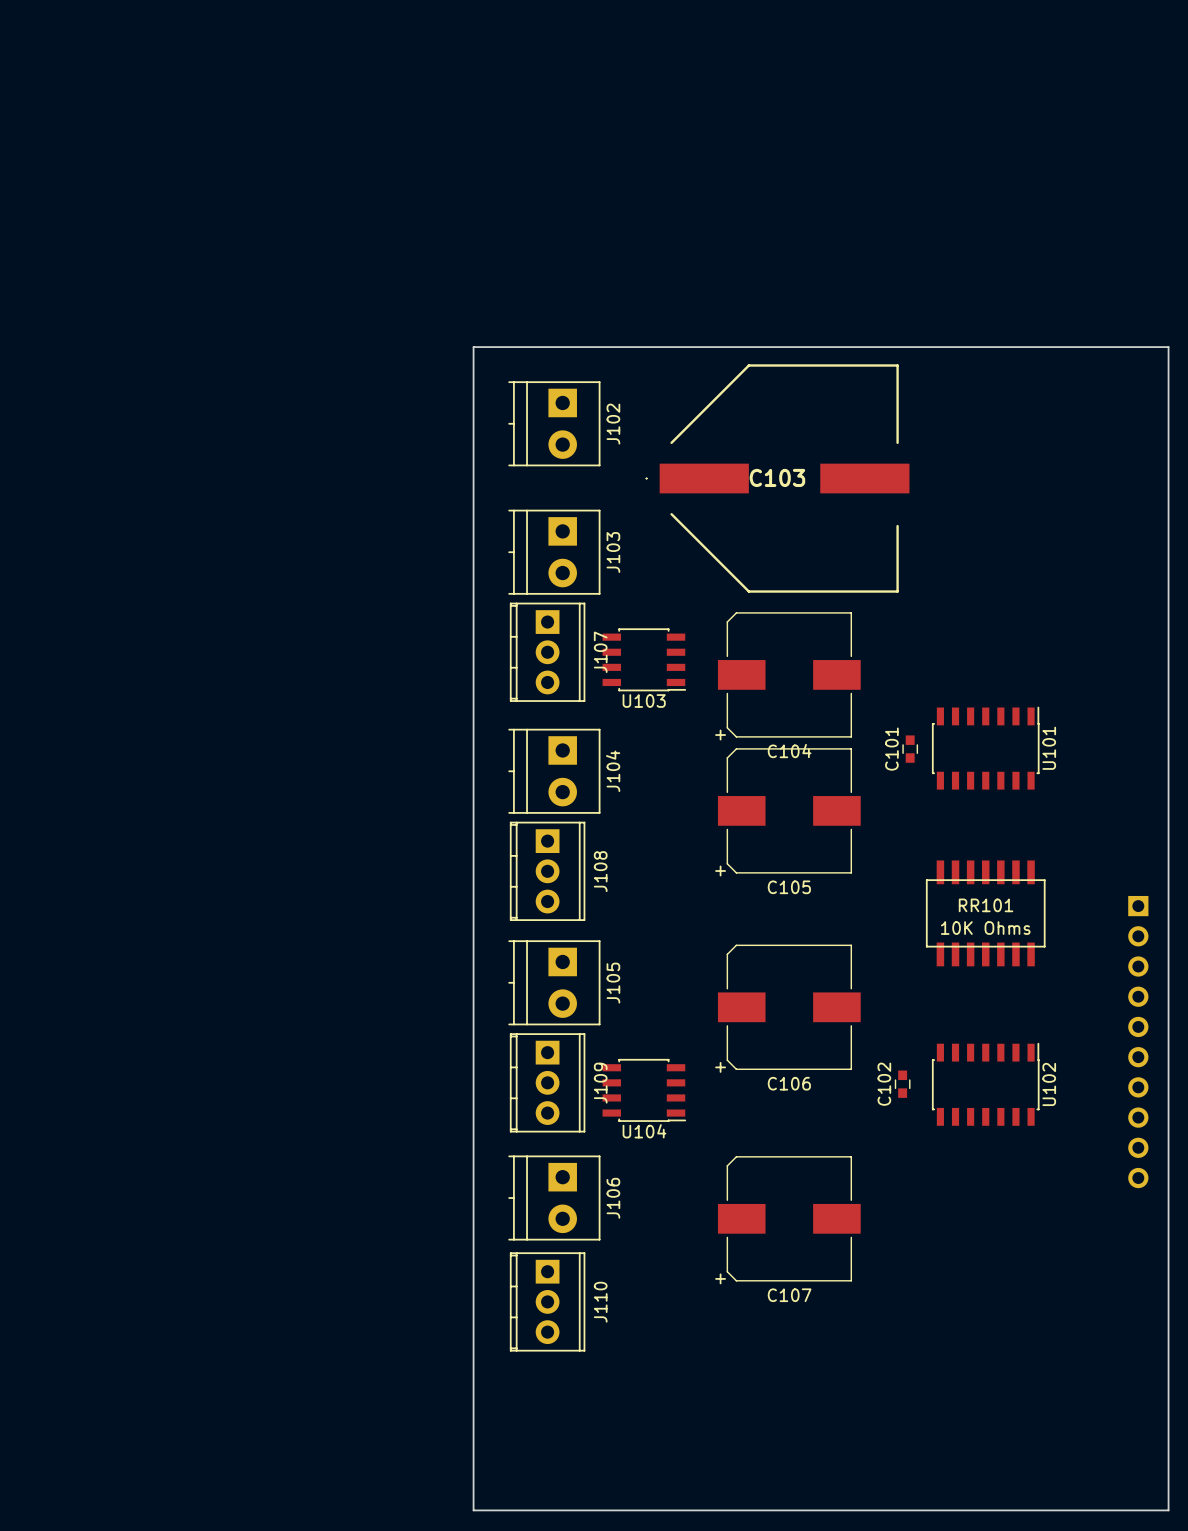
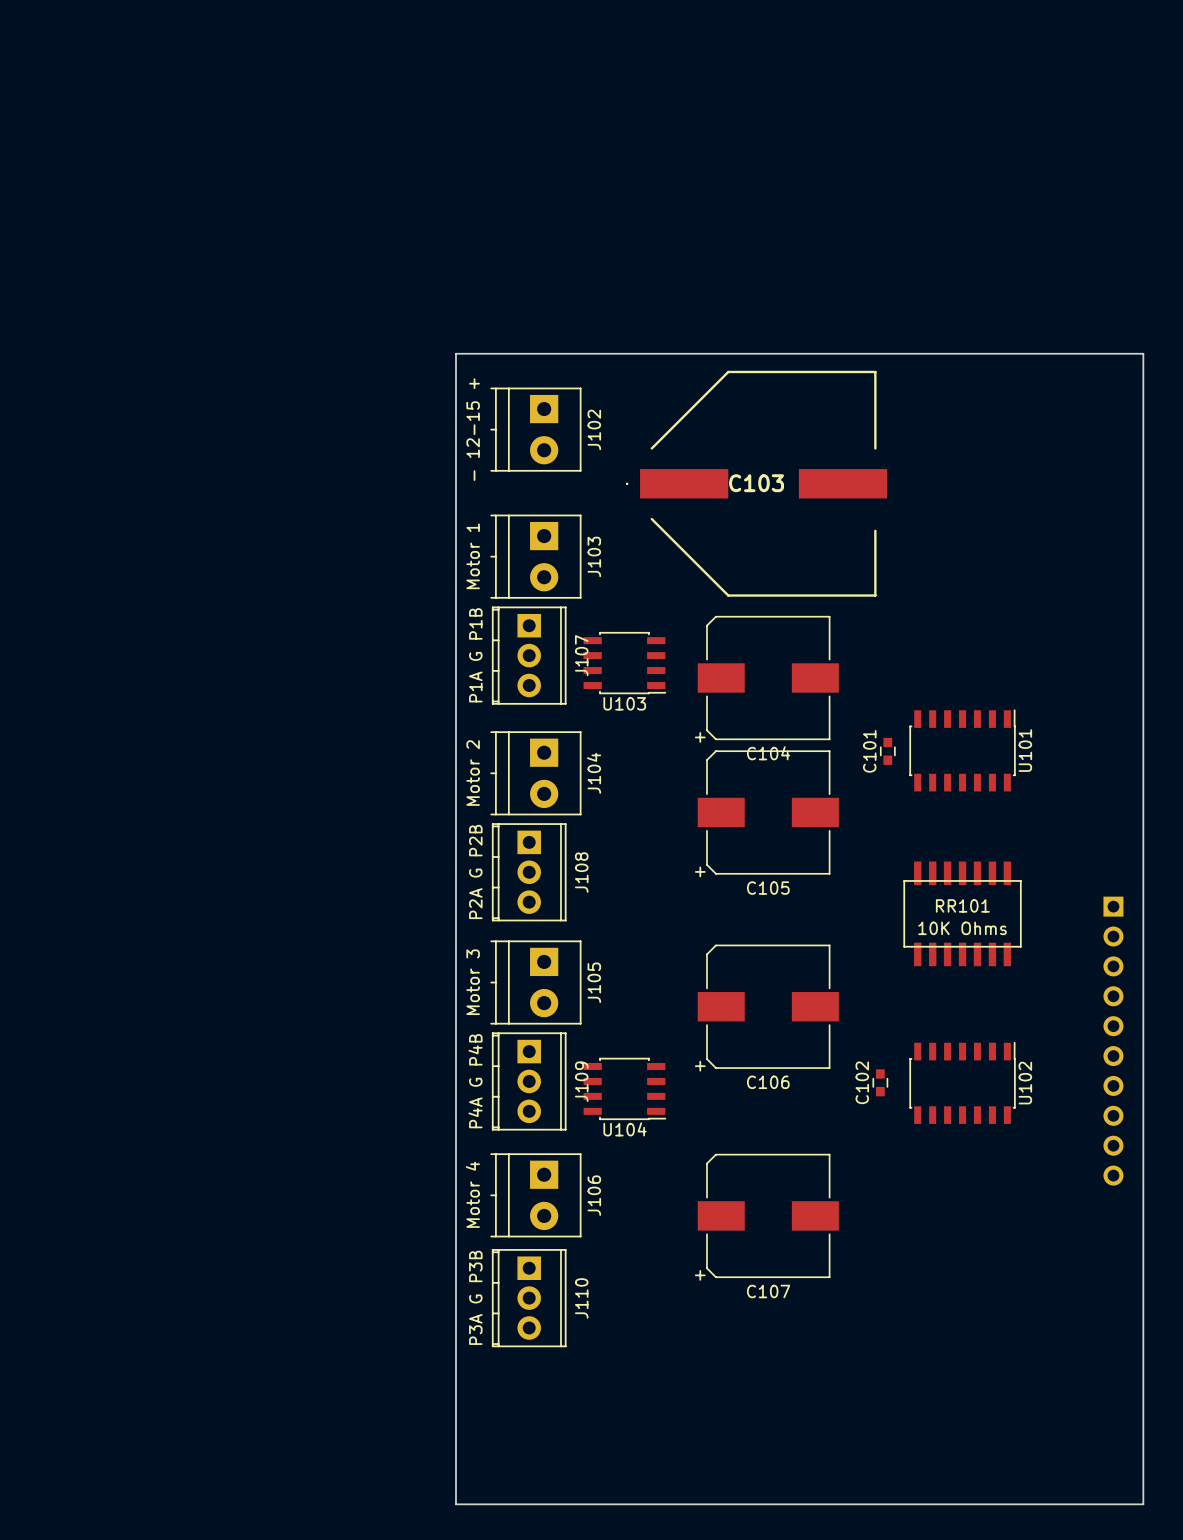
J102 value: none -> - 12-15 + (473, 429)
J103 value: none -> Motor 1 (473, 556)
J107 value: none -> P1A G P1B (475, 655)
J104 value: none -> Motor 2 (473, 773)
J108 value: none -> P2A G P2B (475, 871)
J105 value: none -> Motor 3 (473, 982)
J109 value: none -> P4A G P4B (475, 1081)
J106 value: none -> Motor 4 (472, 1194)
J110 value: none -> P3A G P3B (475, 1297)

